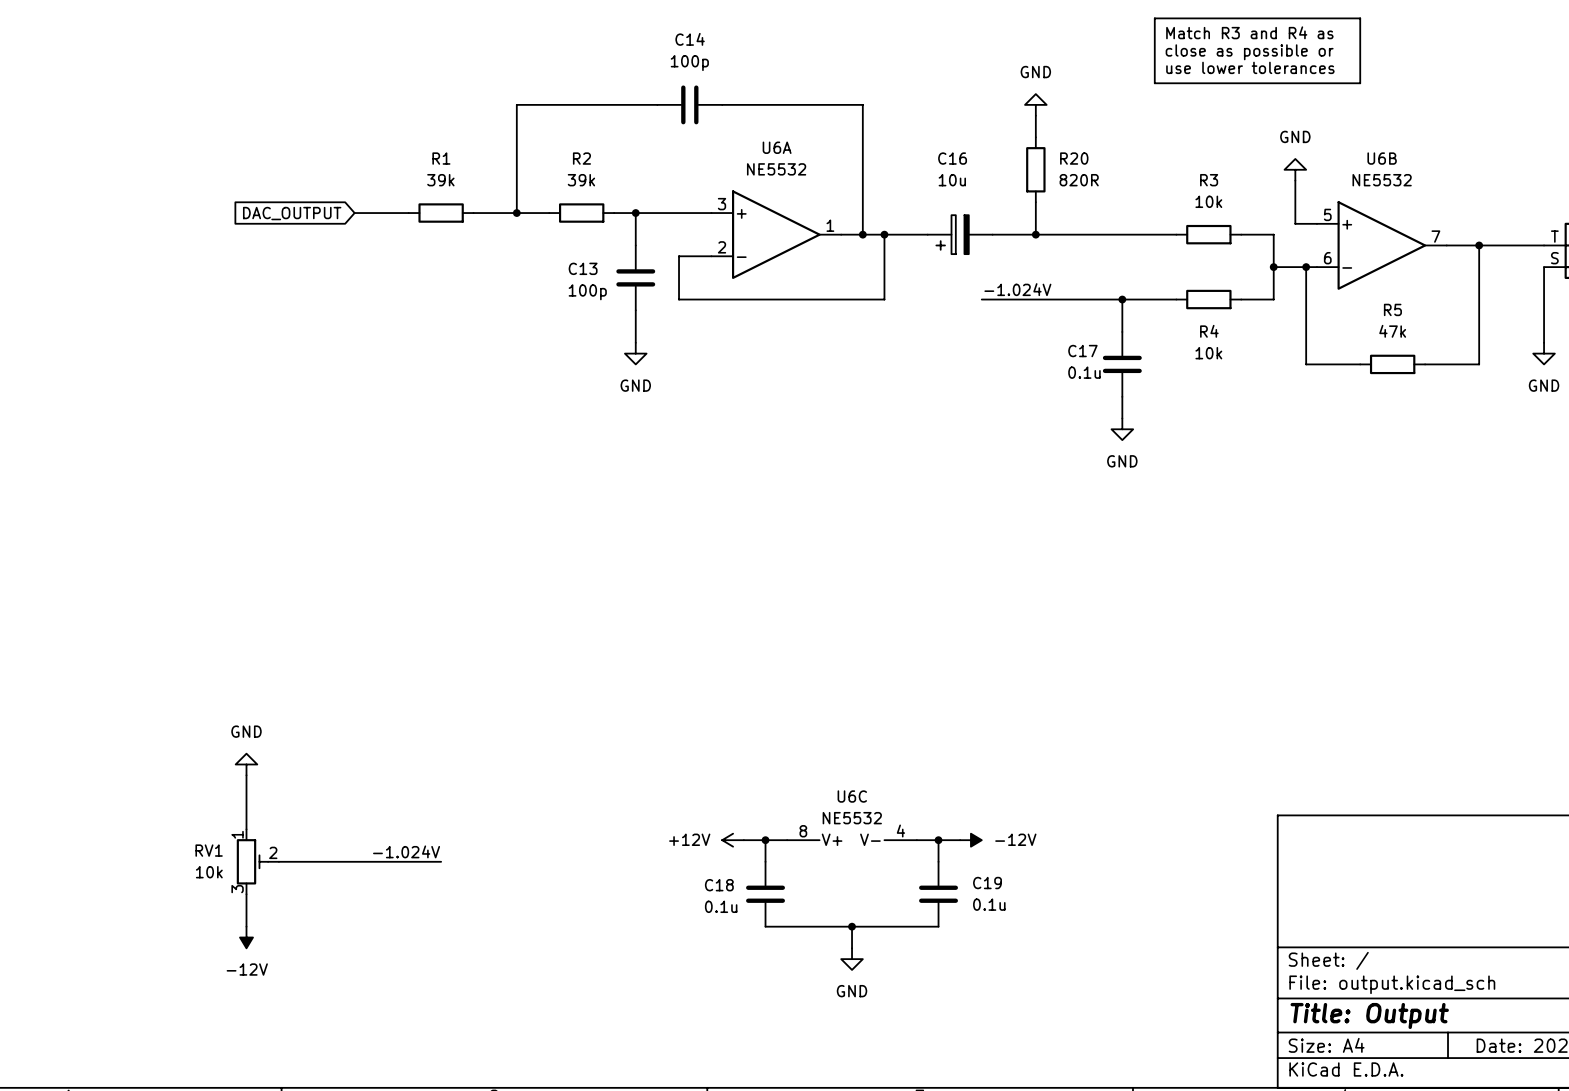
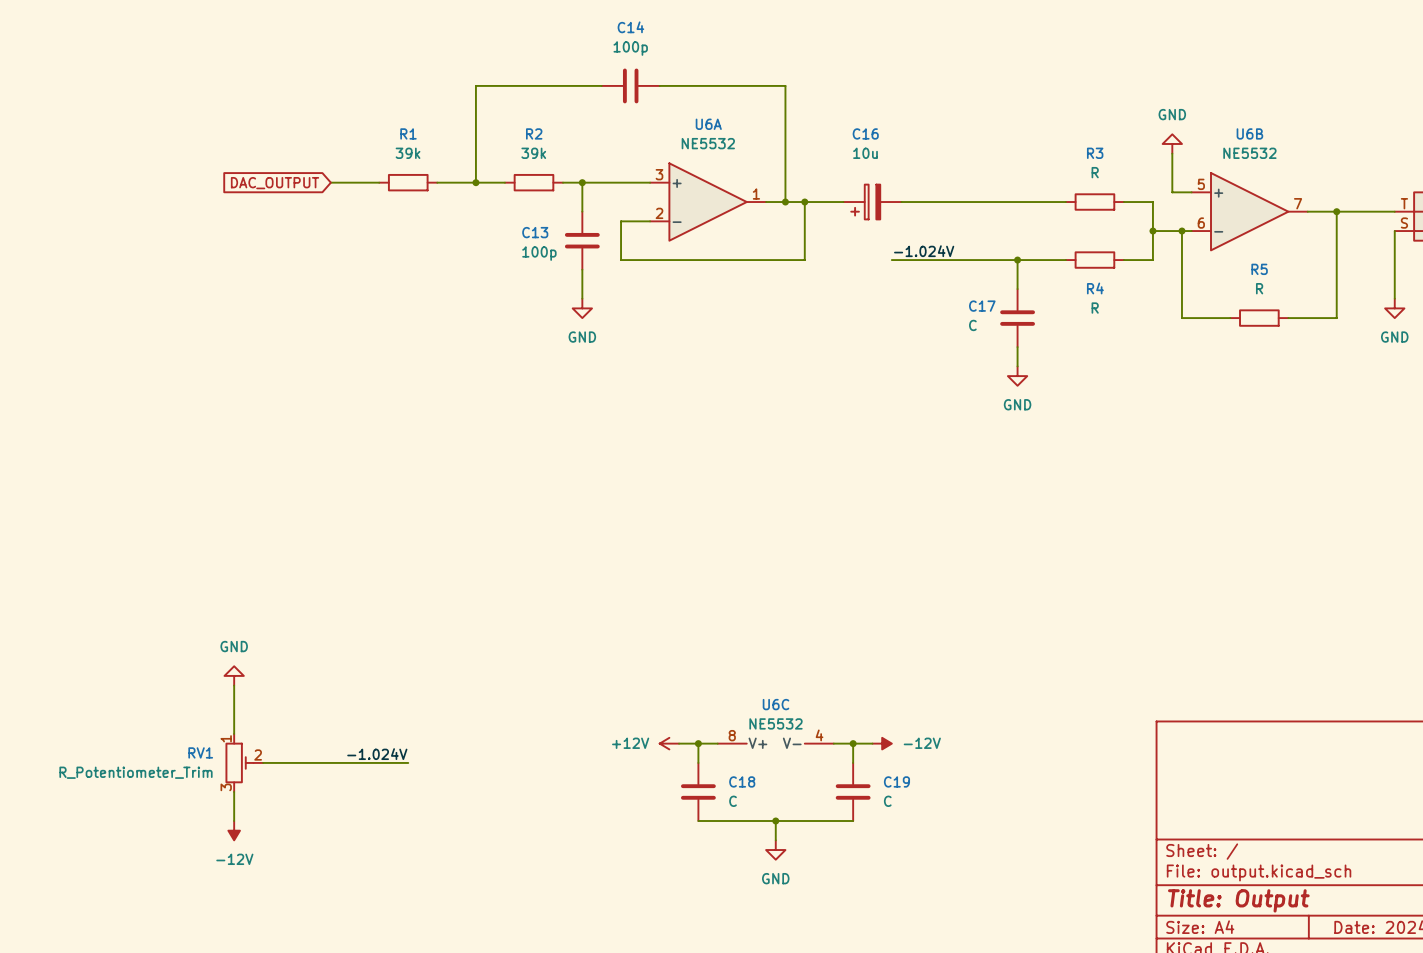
line: (1154, 18) (1360, 18) (1360, 83) (1154, 83) (1154, 18) -> none
text: Match R3 and R4 as (1249, 32) -> none
text: close as possible or (1249, 52) -> none
text: use lower tolerances (1250, 67) -> none
power symbol: GND (1035, 104) -> none
wire: (1035, 115) (1035, 137) -> none
R20: 820R (1035, 169) -> none
R3 value: 10k (1208, 201) -> R (1095, 172)
wire: (1035, 202) (1035, 234) -> none
junction: (1035, 234) -> none
R5 value: 47k (1392, 331) -> R (1259, 288)
R4 value: 10k (1208, 353) -> R (1095, 308)
C17 value: 0.1u (1084, 372) -> C (972, 325)
RV1 value: 10k (209, 872) -> R_Potentiometer_Trim (135, 772)
C18 name position: C18 (719, 885) -> C18 (742, 781)
C19 value: 0.1u (989, 904) -> C (887, 801)
C18 value: 0.1u (721, 906) -> C (733, 801)

